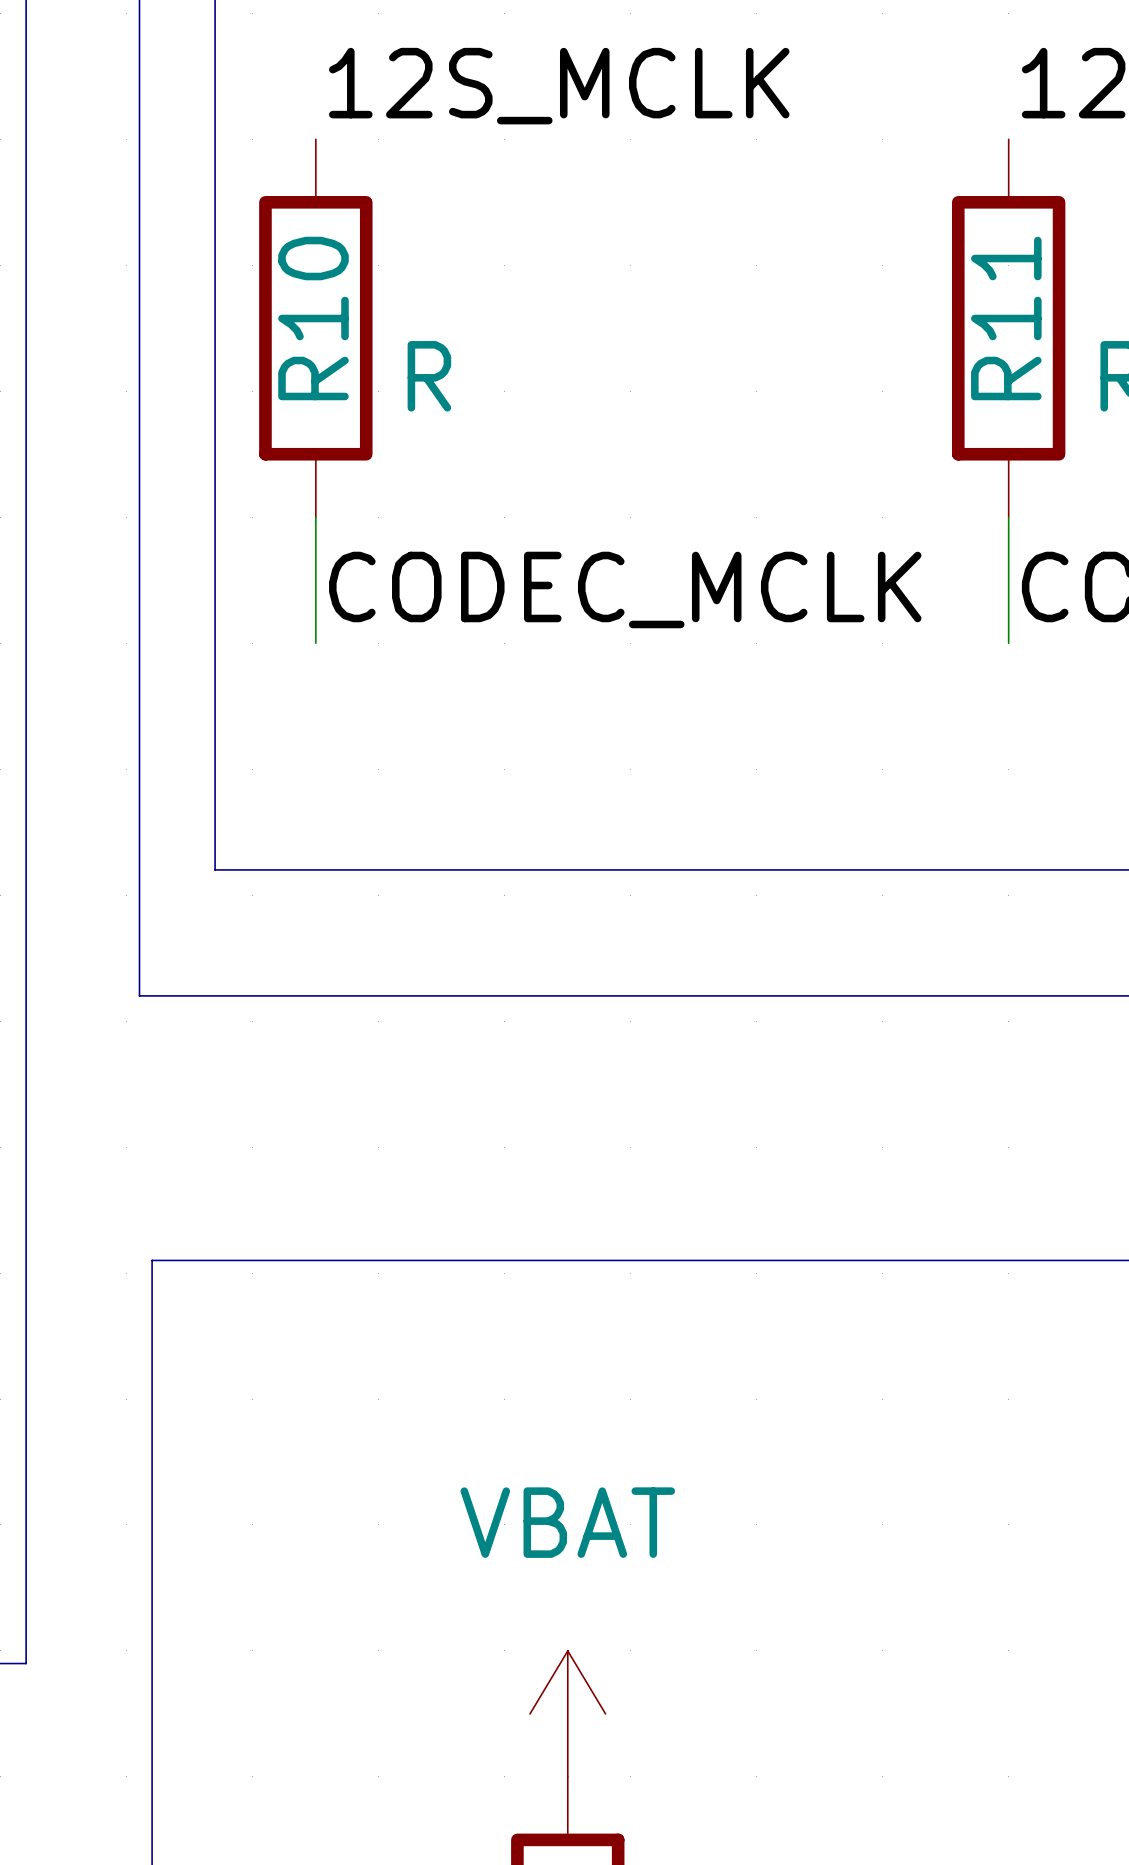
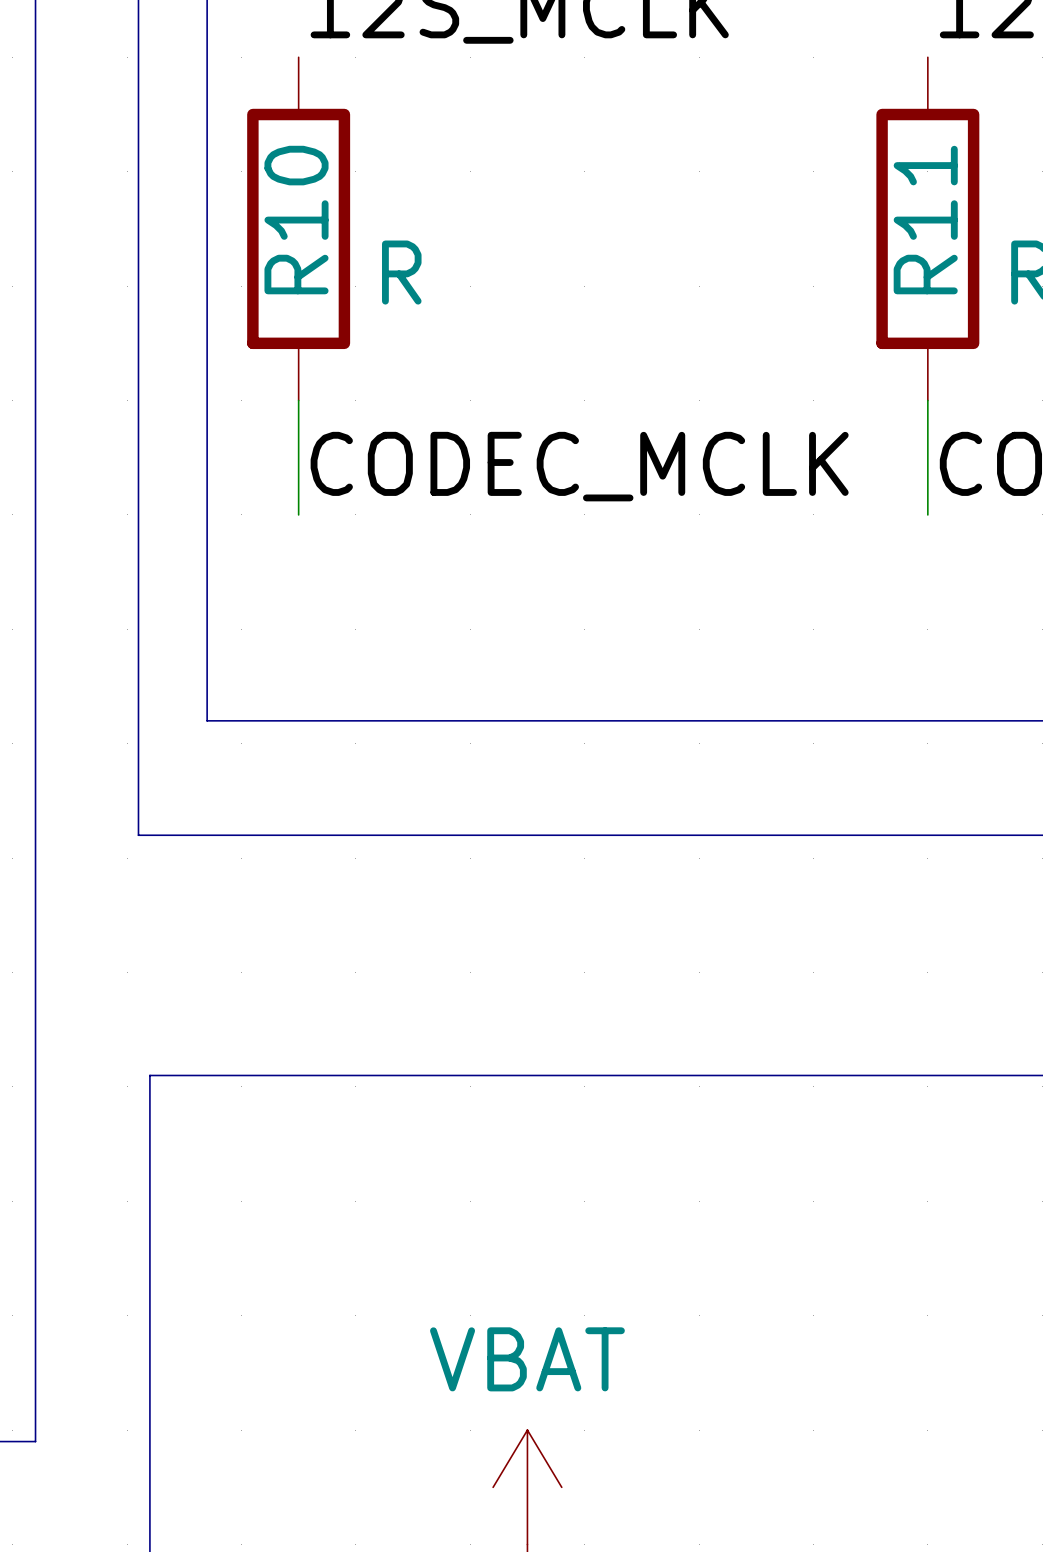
power symbol text position: VBAT (567, 1522) -> VBAT (527, 1359)

